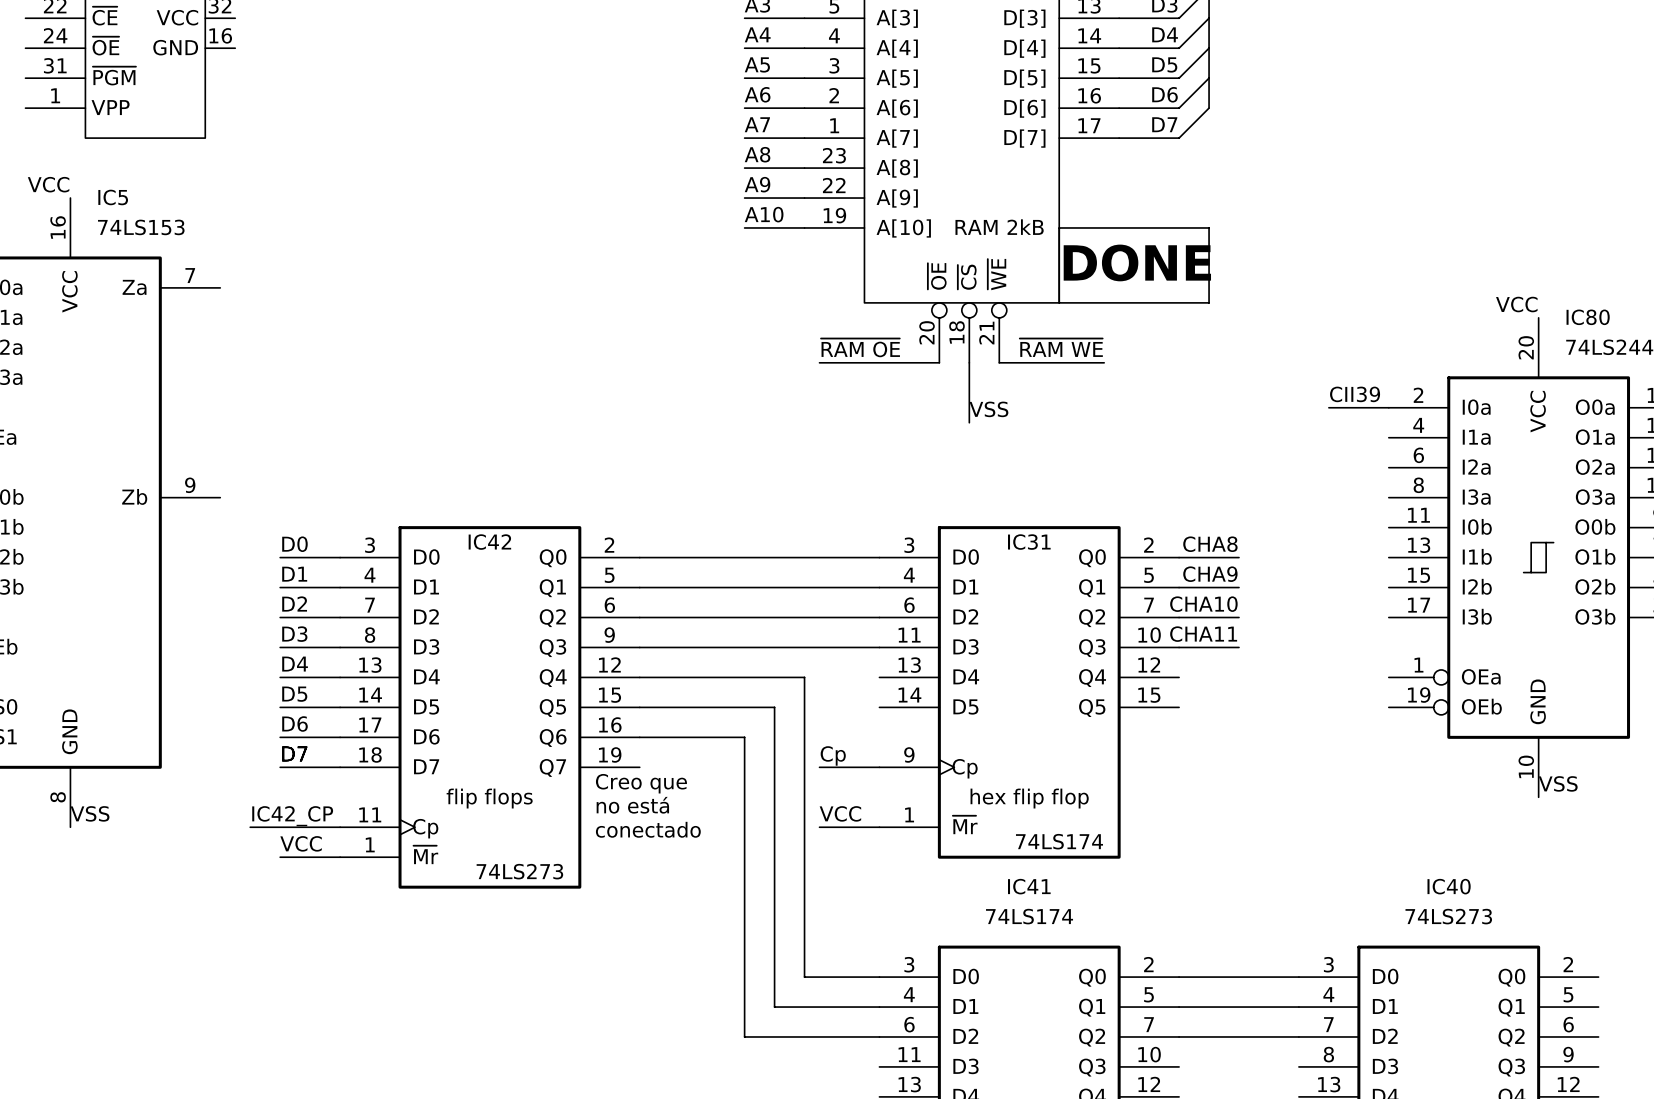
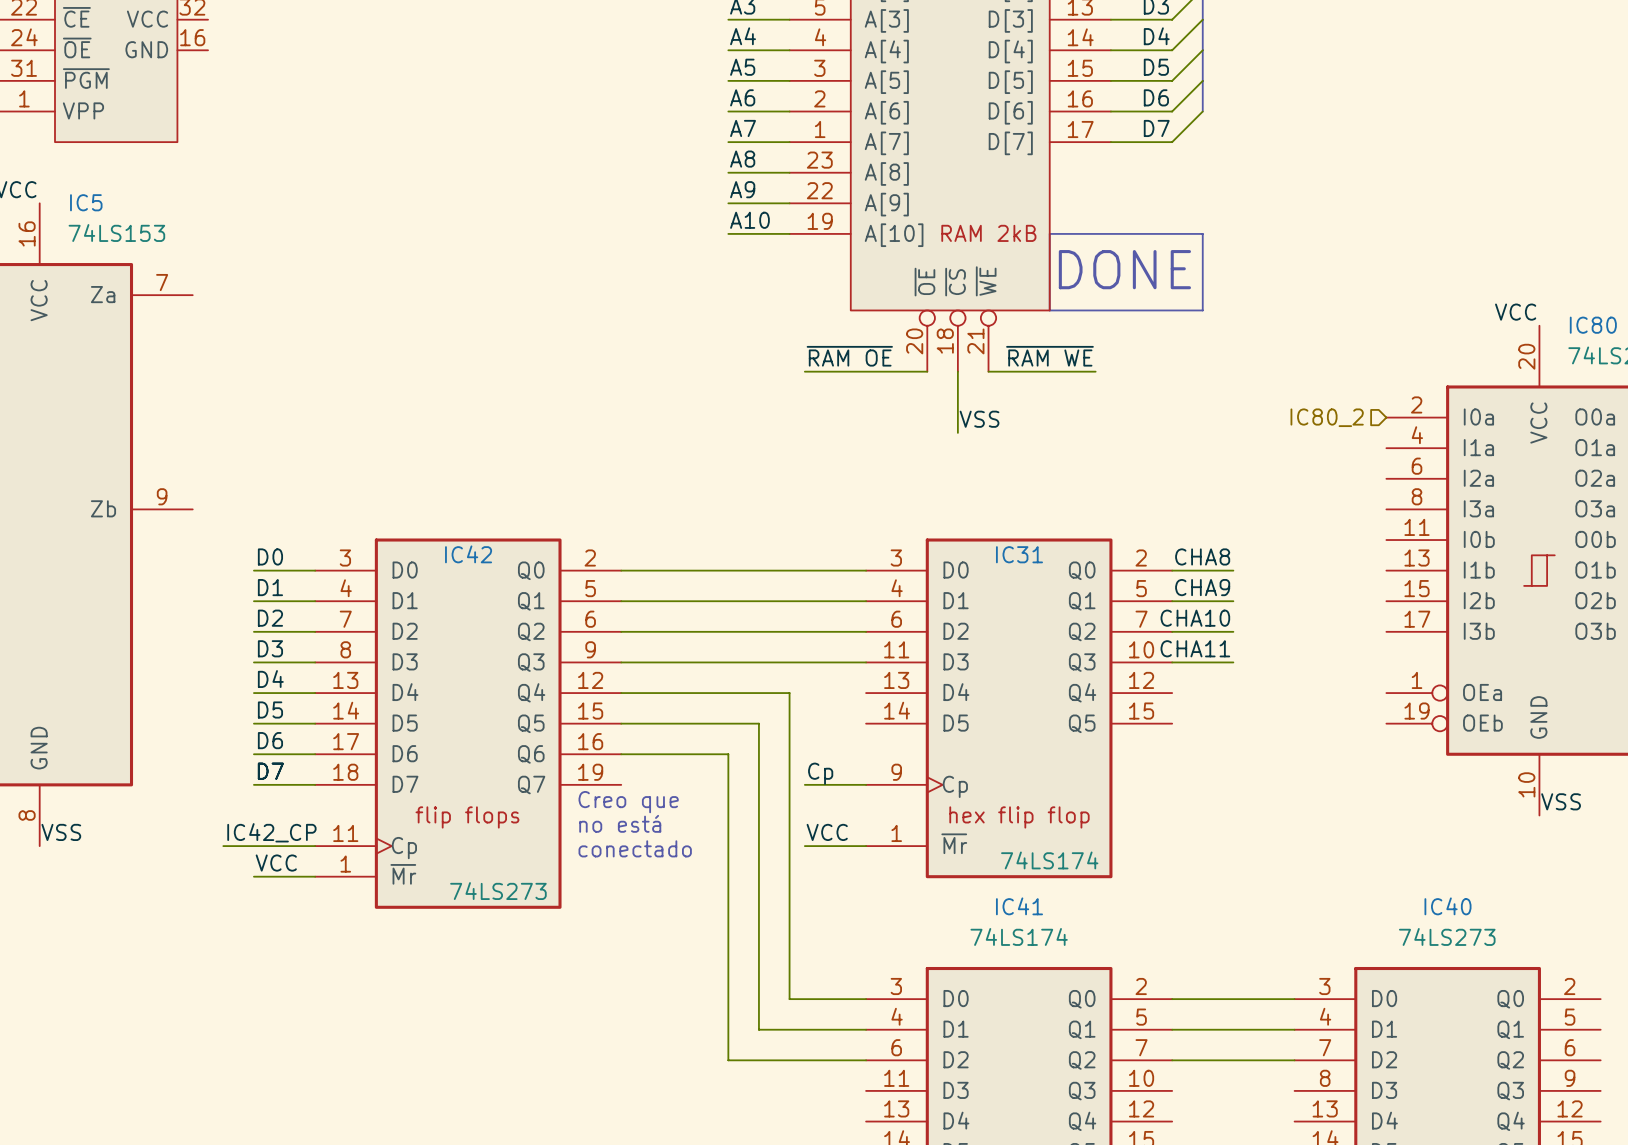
label: CII39 (1355, 394) -> none
wire: (1328, 407) (1388, 407) -> none
hierarchical label: none -> IC80_2 (1327, 417)

